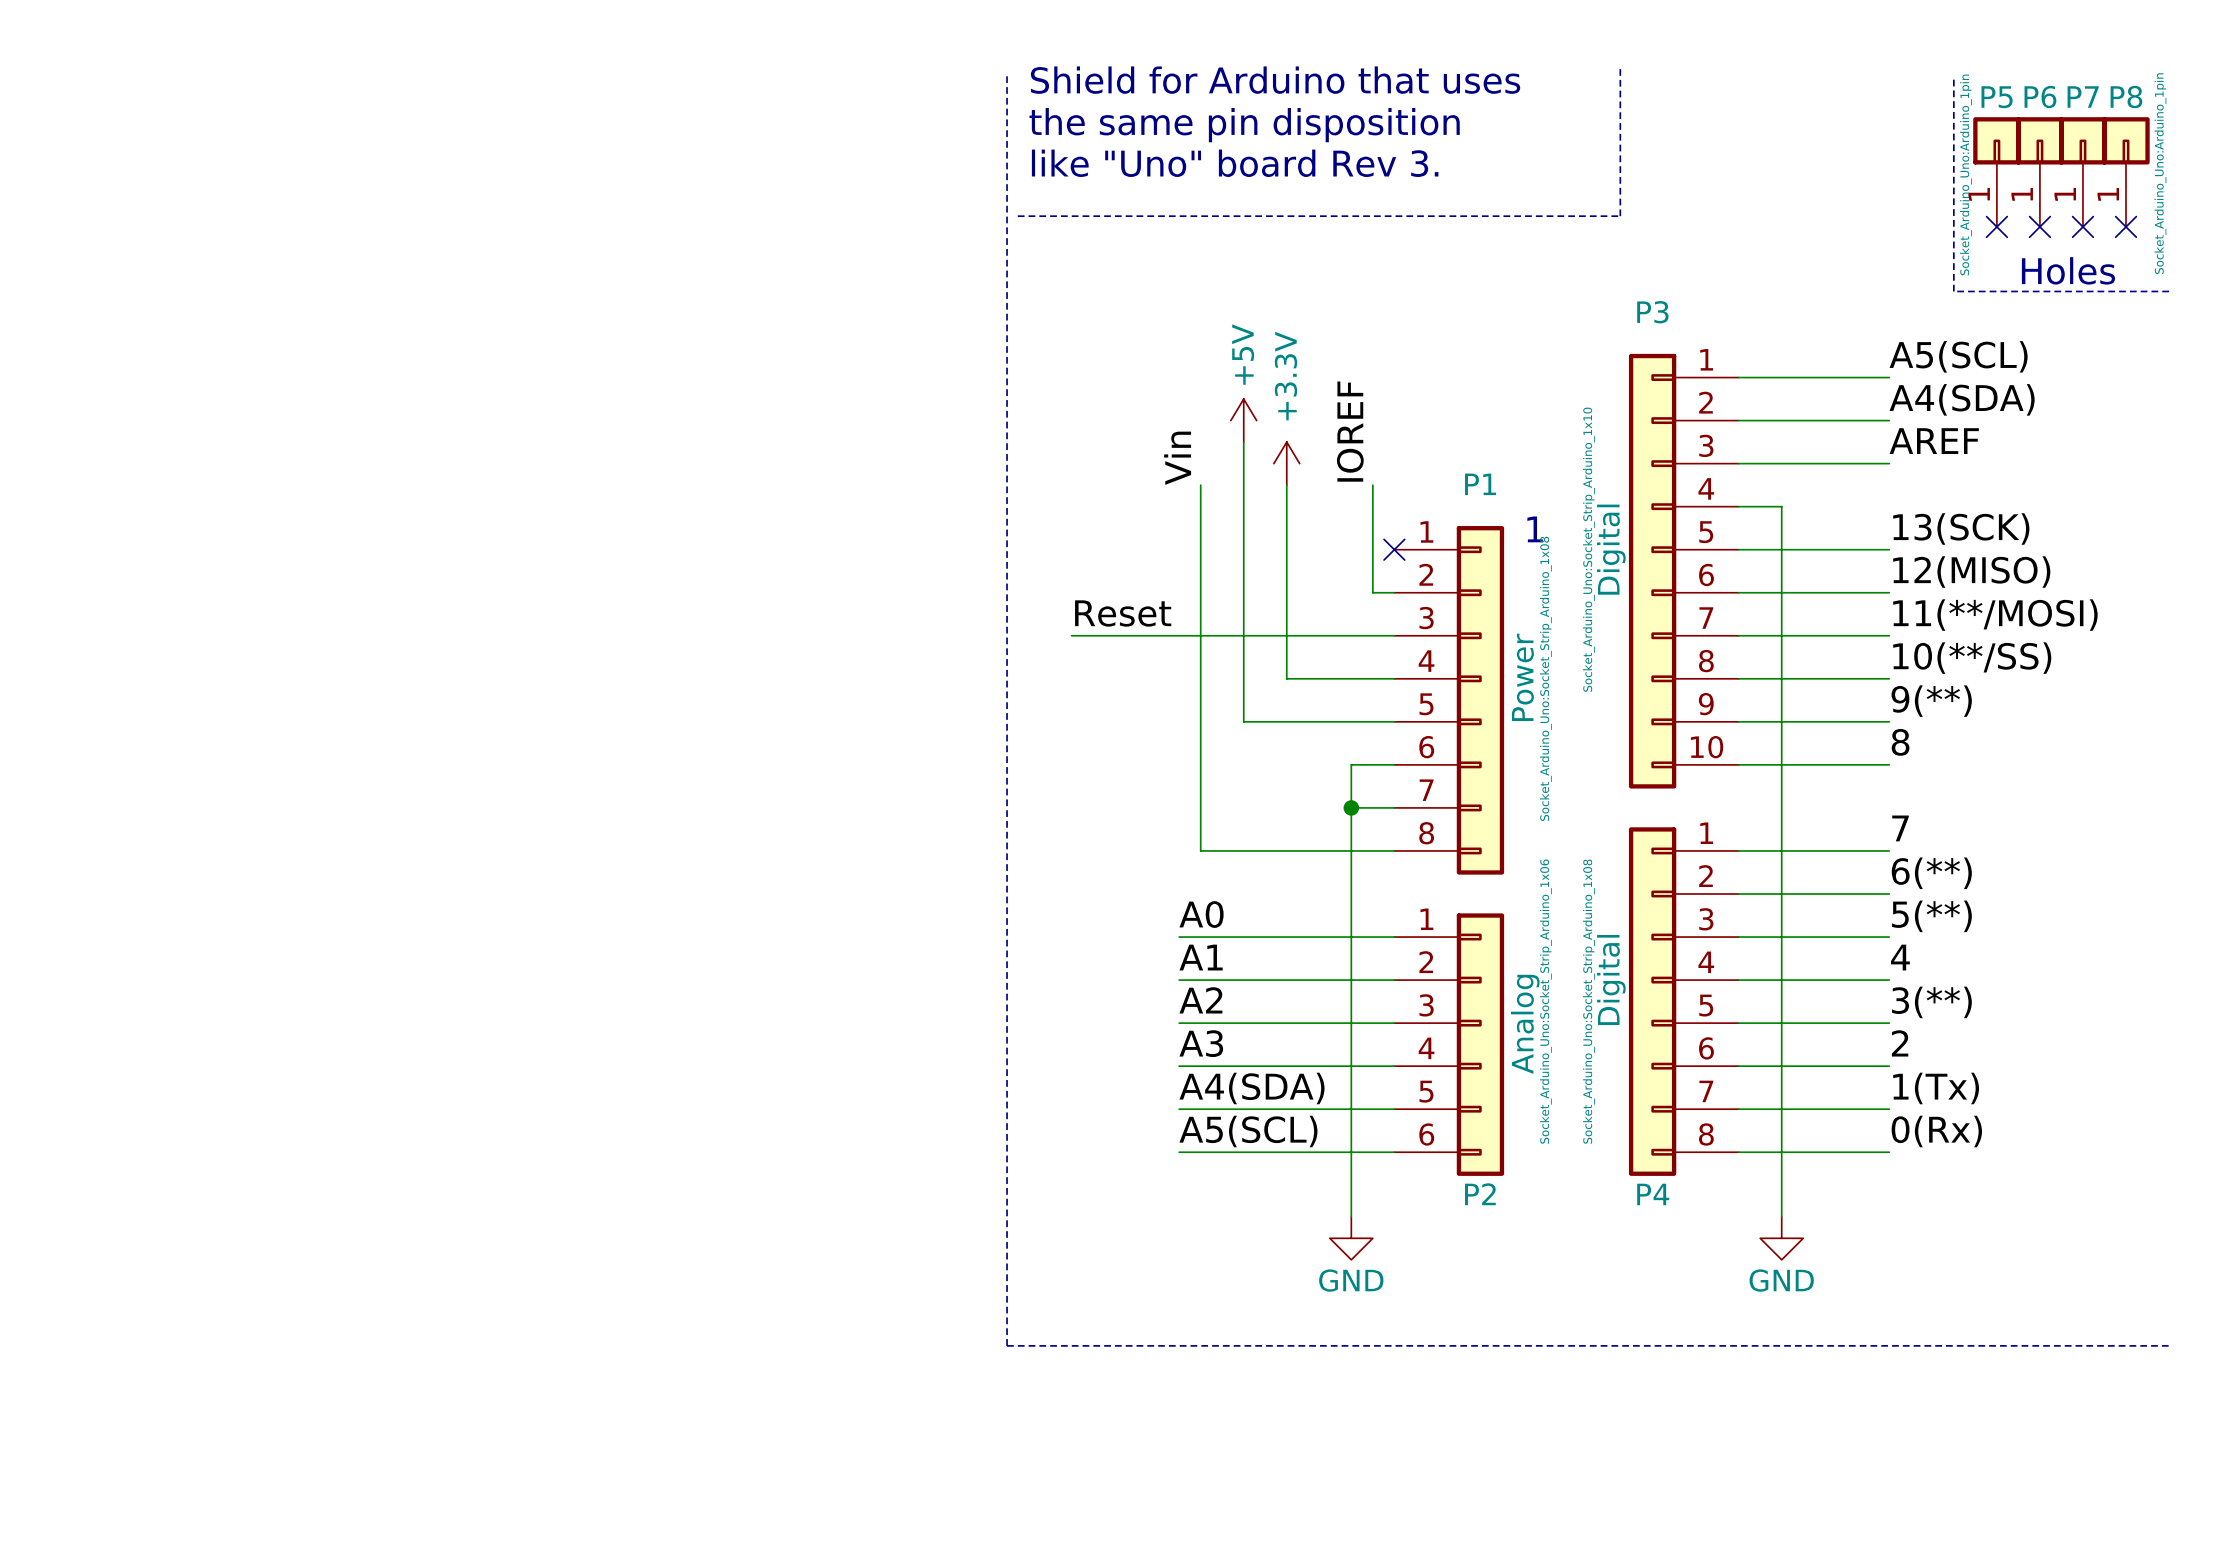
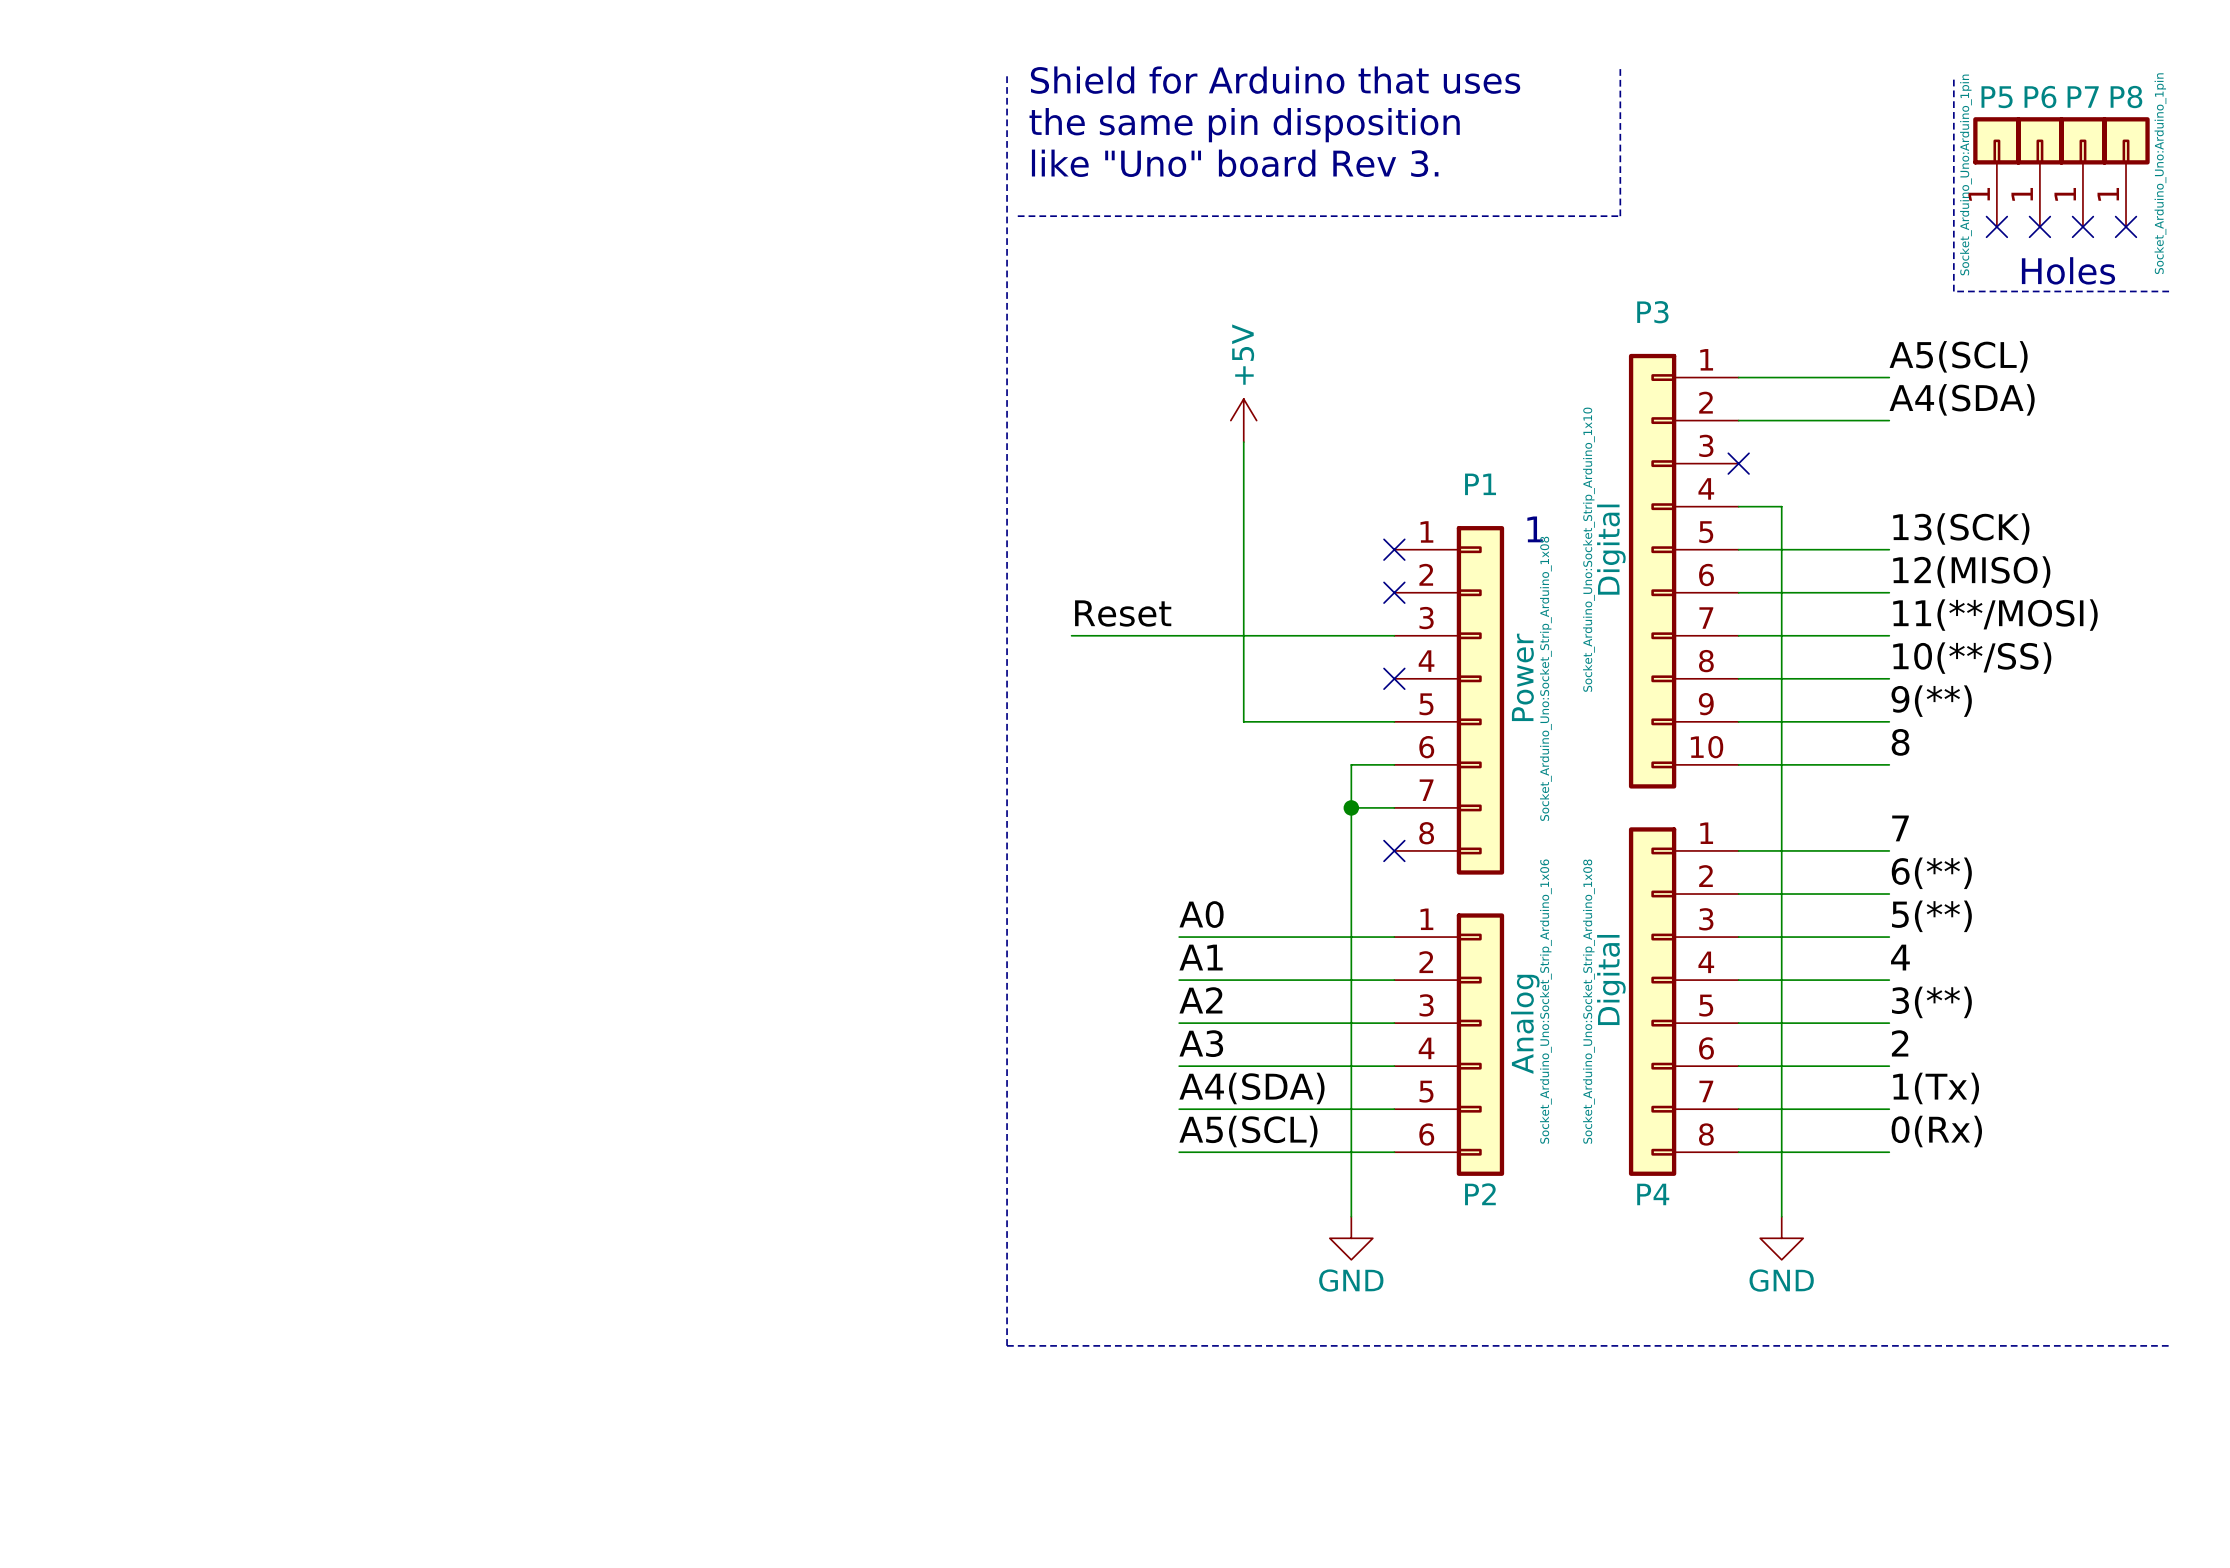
label: IOREF (1350, 431) -> none
label: AREF (1934, 441) -> none
label: Vin (1177, 458) -> none
power symbol: +3.3V (1286, 463) -> none
wire: (1738, 463) (1889, 463) -> none
no-connect mark: none -> (1738, 463)
wire: (1200, 485) (1200, 850) (1394, 850) -> none
wire: (1286, 485) (1286, 678) (1394, 678) -> none
wire: (1372, 485) (1372, 592) (1394, 592) -> none
no-connect mark: none -> (1394, 592)
no-connect mark: none -> (1394, 678)
no-connect mark: none -> (1394, 850)

